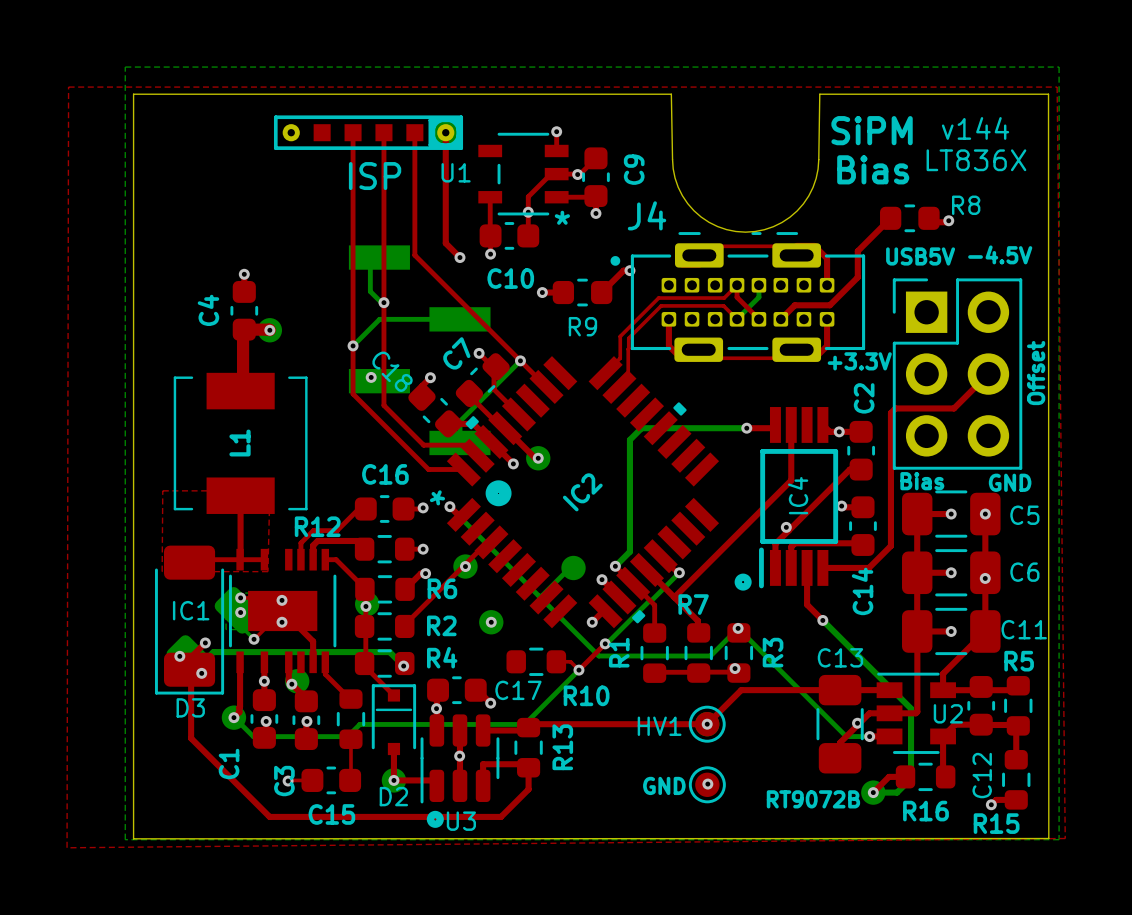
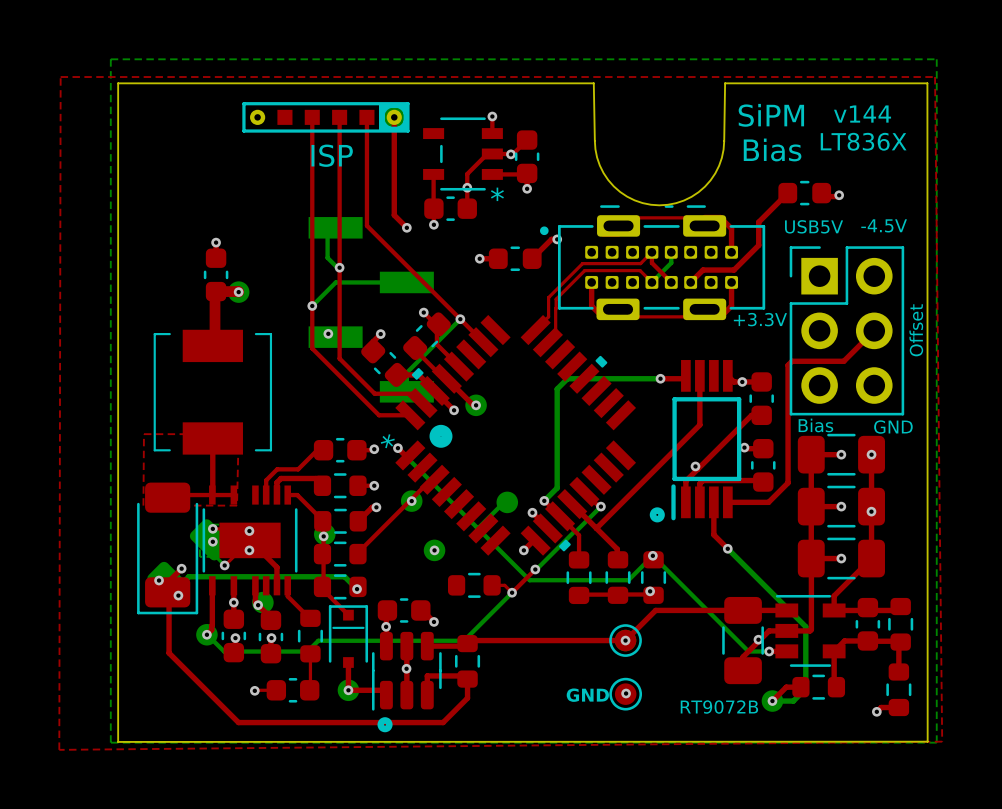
C9 name: C9 (634, 169) -> none
U1 name: U1 (456, 172) -> none
R8 name: R8 (966, 205) -> none
J4 name: J4 (647, 215) -> none
C10 name: C10 (510, 278) -> none
C4 name: C4 (208, 310) -> none
R9 name: R9 (582, 326) -> none
C7 name: C7 (456, 353) -> none
C18 name: C18 (392, 371) -> none
C2 name: C2 (864, 398) -> none
L1 name: L1 (240, 443) -> none
C16 name: C16 (385, 474) -> none
IC2 name: IC2 (582, 492) -> none
IC4 name: IC4 (798, 495) -> none
C5 name: C5 (1024, 515) -> none
R12 name: R12 (317, 526) -> none
C6 name: C6 (1024, 572) -> none
R6 name: R6 (442, 588) -> none
C14 name: C14 (862, 591) -> none
R7 name: R7 (693, 604) -> none
IC1 name: IC1 (191, 610) -> none
R2 name: R2 (441, 625) -> none
C11 name: C11 (1024, 629) -> none
R1 name: R1 (619, 652) -> none
R3 name: R3 (773, 652) -> none
R4 name: R4 (442, 657) -> none
C13 name: C13 (840, 657) -> none
R5 name: R5 (1019, 661) -> none
C17 name: C17 (518, 690) -> none
R10 name: R10 (586, 695) -> none
D3 name: D3 (190, 707) -> none
U2 name: U2 (948, 713) -> none
HV1 name: HV1 (659, 726) -> none
R13 name: R13 (562, 747) -> none
C1 name: C1 (229, 764) -> none
C12 name: C12 (982, 775) -> none
C3 name: C3 (284, 781) -> none
D2 name: D2 (393, 796) -> none
R16 name: R16 (925, 811) -> none
C15 name: C15 (331, 814) -> none
U3 name: U3 (461, 821) -> none
R15 name: R15 (996, 823) -> none

